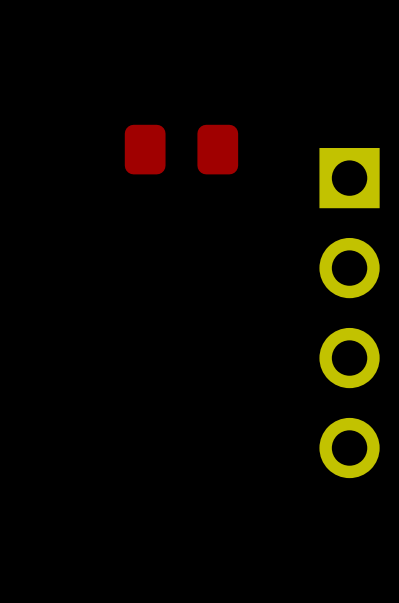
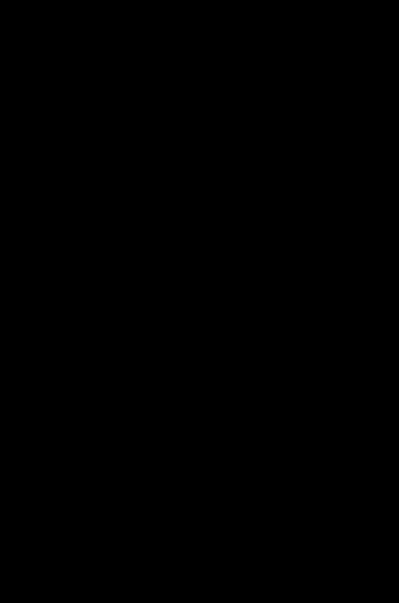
part: (181, 149) -> none
part: (349, 313) -> none

